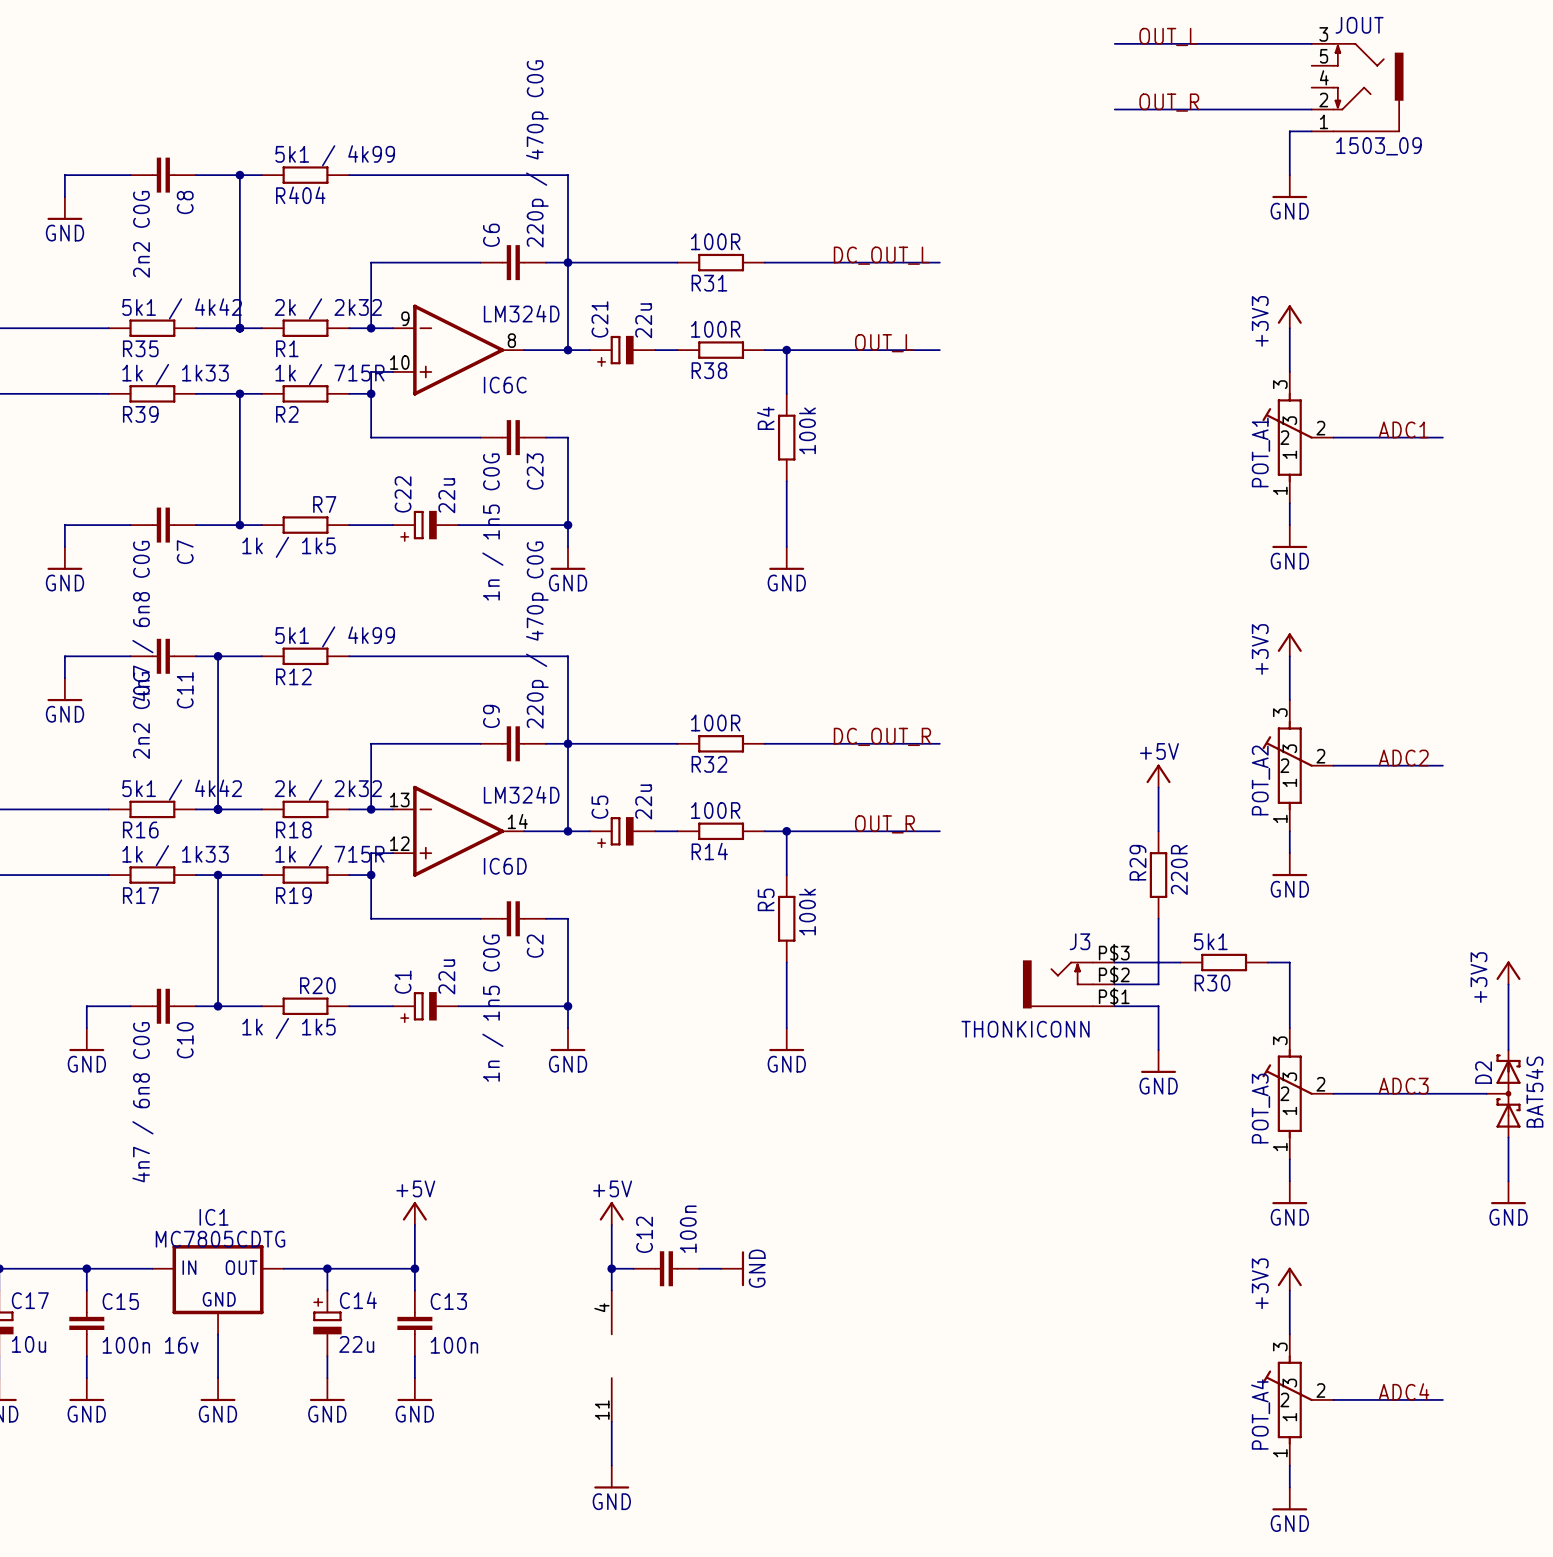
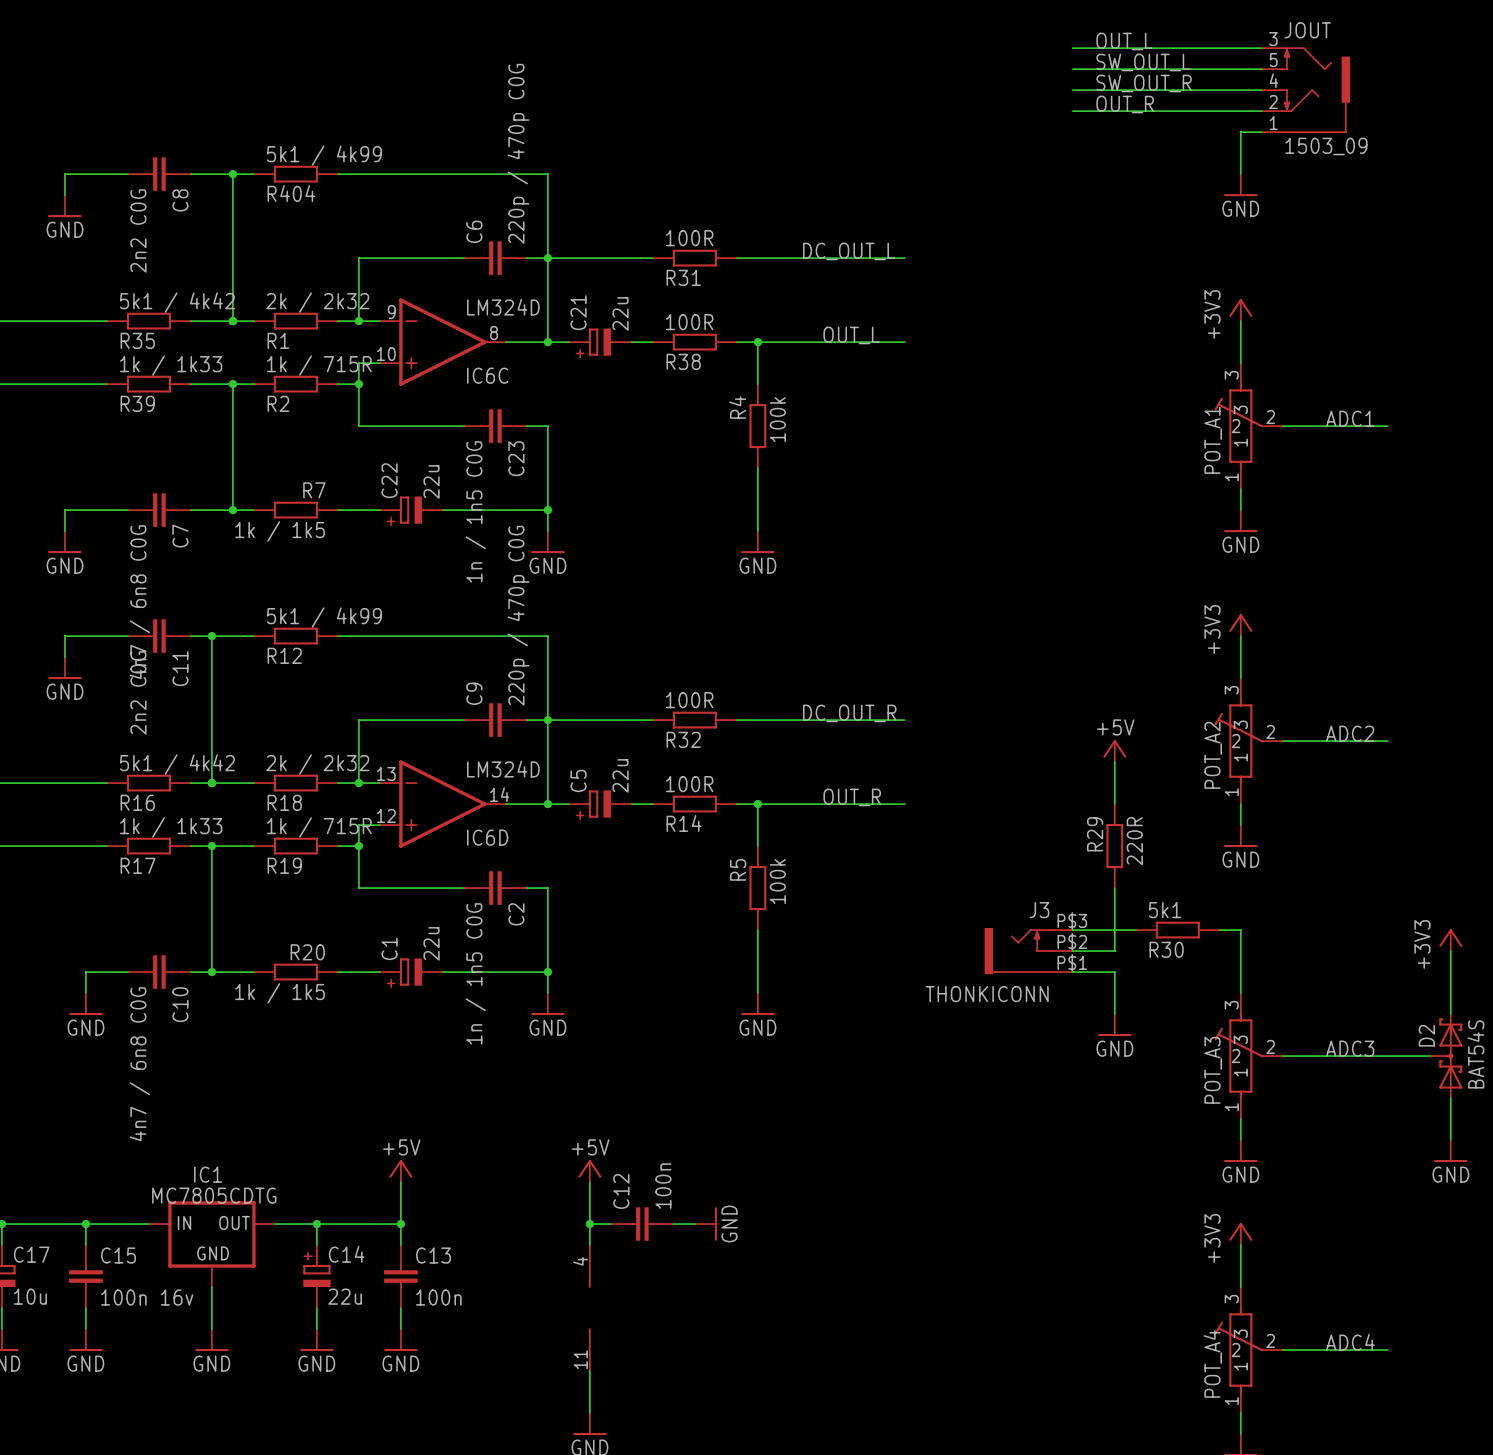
label: none -> SW_OUT_L (1143, 62)
wire: none -> (1072, 69) (1261, 69)
label: none -> SW_OUT_R (1144, 83)
wire: none -> (1072, 90) (1261, 90)

